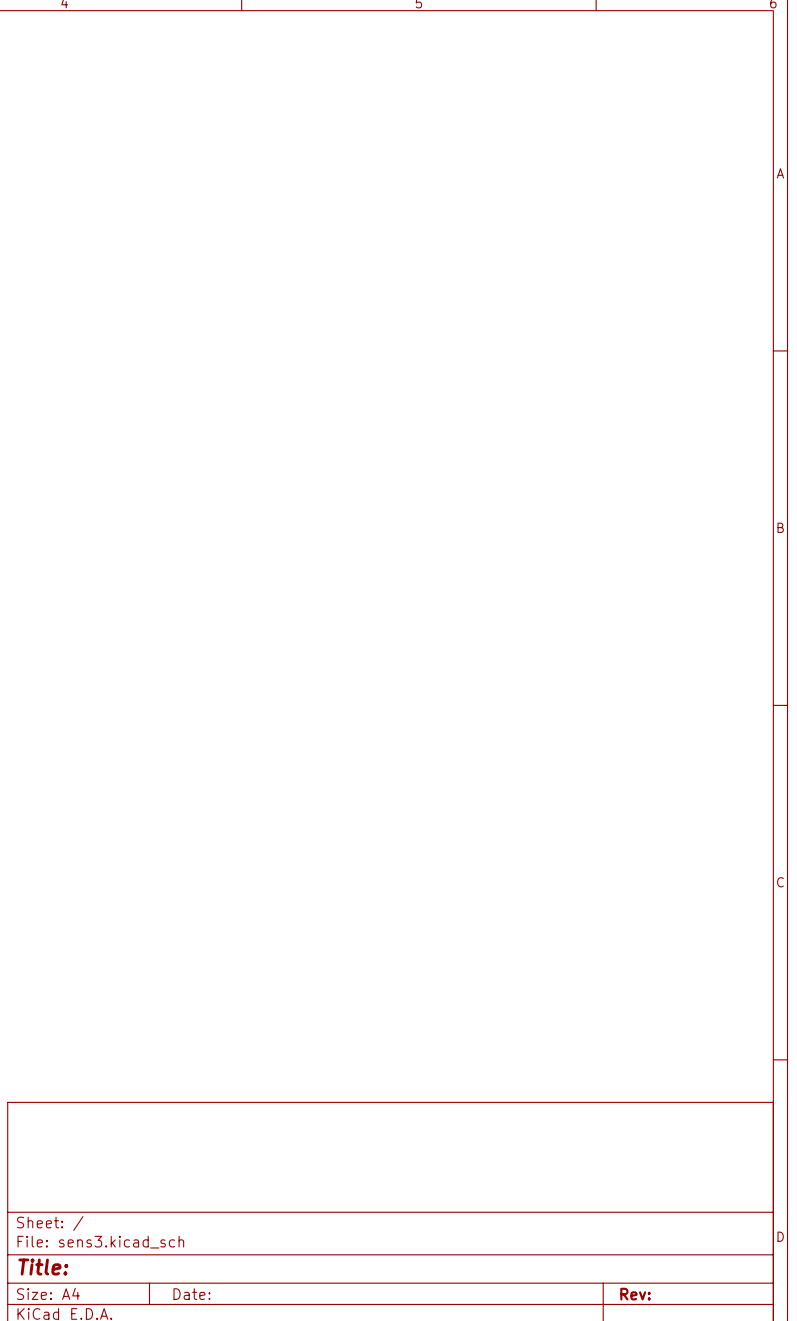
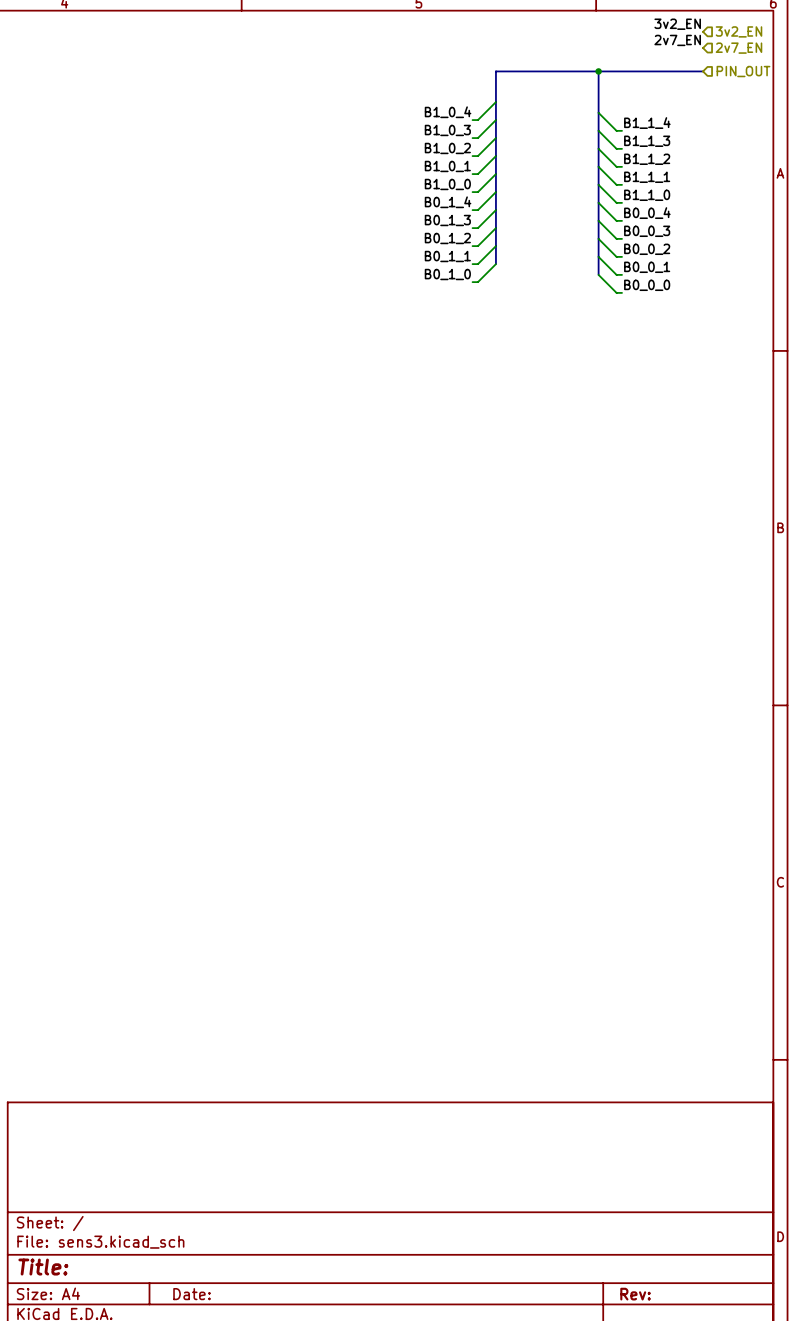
label: none -> 3v2_EN (677, 24)
hierarchical label: none -> 3v2_EN (738, 31)
label: none -> 2v7_EN (677, 40)
hierarchical label: none -> 2v7_EN (738, 48)
bus: none -> (598, 71) (598, 274)
junction: none -> (598, 71)
bus: none -> (703, 71) (495, 71) (495, 264)
hierarchical label: none -> PIN_OUT (743, 71)
wire: none -> (495, 102) (477, 120) (472, 120)
label: none -> B1_0_4 (448, 112)
wire: none -> (598, 112) (616, 130) (622, 130)
wire: none -> (495, 120) (477, 138) (472, 138)
label: none -> B1_1_4 (647, 123)
label: none -> B1_0_3 (447, 130)
wire: none -> (598, 130) (616, 148) (622, 148)
wire: none -> (495, 138) (477, 156) (472, 156)
label: none -> B1_1_3 (647, 141)
label: none -> B1_0_2 (447, 148)
wire: none -> (598, 148) (616, 166) (622, 166)
wire: none -> (495, 156) (477, 174) (472, 174)
label: none -> B1_1_2 (647, 159)
label: none -> B1_0_1 (447, 166)
wire: none -> (598, 166) (616, 184) (622, 184)
wire: none -> (495, 174) (477, 192) (472, 192)
label: none -> B1_1_1 (647, 177)
label: none -> B1_0_0 (447, 184)
wire: none -> (598, 184) (616, 202) (622, 202)
wire: none -> (495, 192) (477, 210) (472, 210)
label: none -> B1_1_0 (647, 195)
label: none -> B0_1_4 (448, 202)
wire: none -> (598, 202) (616, 220) (622, 220)
wire: none -> (495, 210) (477, 228) (472, 228)
label: none -> B0_0_4 (647, 213)
label: none -> B0_1_3 (447, 220)
wire: none -> (598, 220) (616, 238) (622, 238)
wire: none -> (495, 228) (477, 246) (472, 246)
label: none -> B0_0_3 (647, 231)
label: none -> B0_1_2 (447, 238)
wire: none -> (598, 238) (616, 256) (622, 256)
wire: none -> (495, 246) (477, 264) (472, 264)
label: none -> B0_0_2 (647, 249)
label: none -> B0_1_1 (447, 256)
wire: none -> (598, 256) (616, 274) (622, 274)
wire: none -> (495, 264) (477, 282) (472, 282)
label: none -> B0_0_1 (647, 267)
label: none -> B0_1_0 (447, 274)
wire: none -> (598, 274) (616, 292) (622, 292)
label: none -> B0_0_0 (647, 285)

